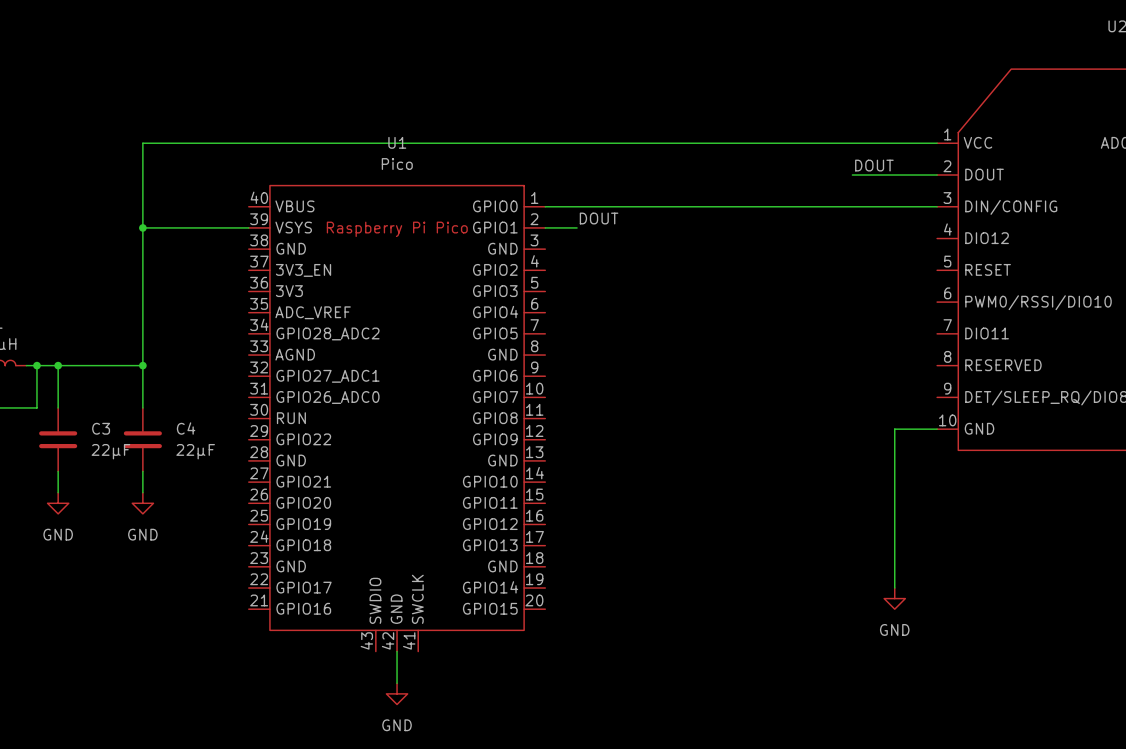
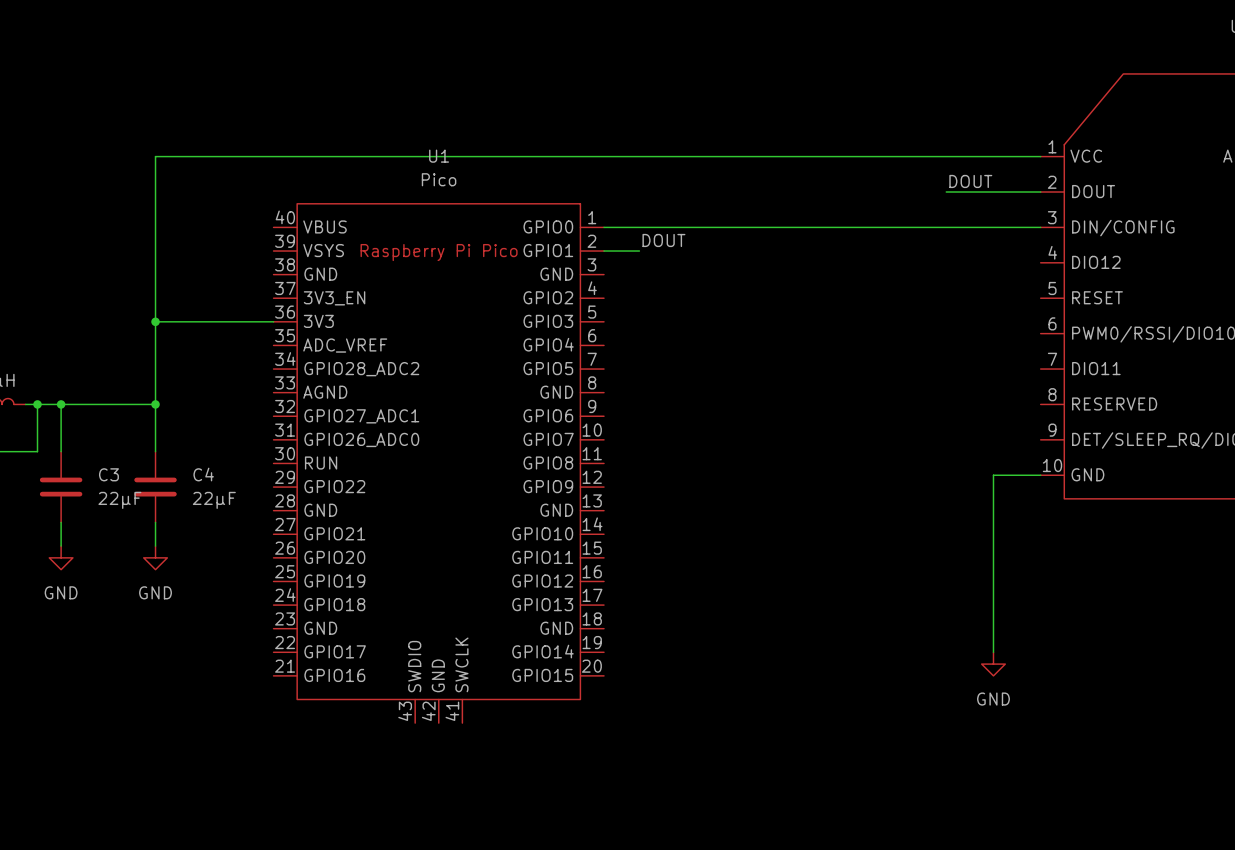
wire: (142, 227) (248, 227) -> (155, 321) (273, 321)
junction: (142, 227) -> none
junction: none -> (155, 321)
wire: (397, 651) (397, 683) -> none
power symbol: GND (397, 693) -> none

